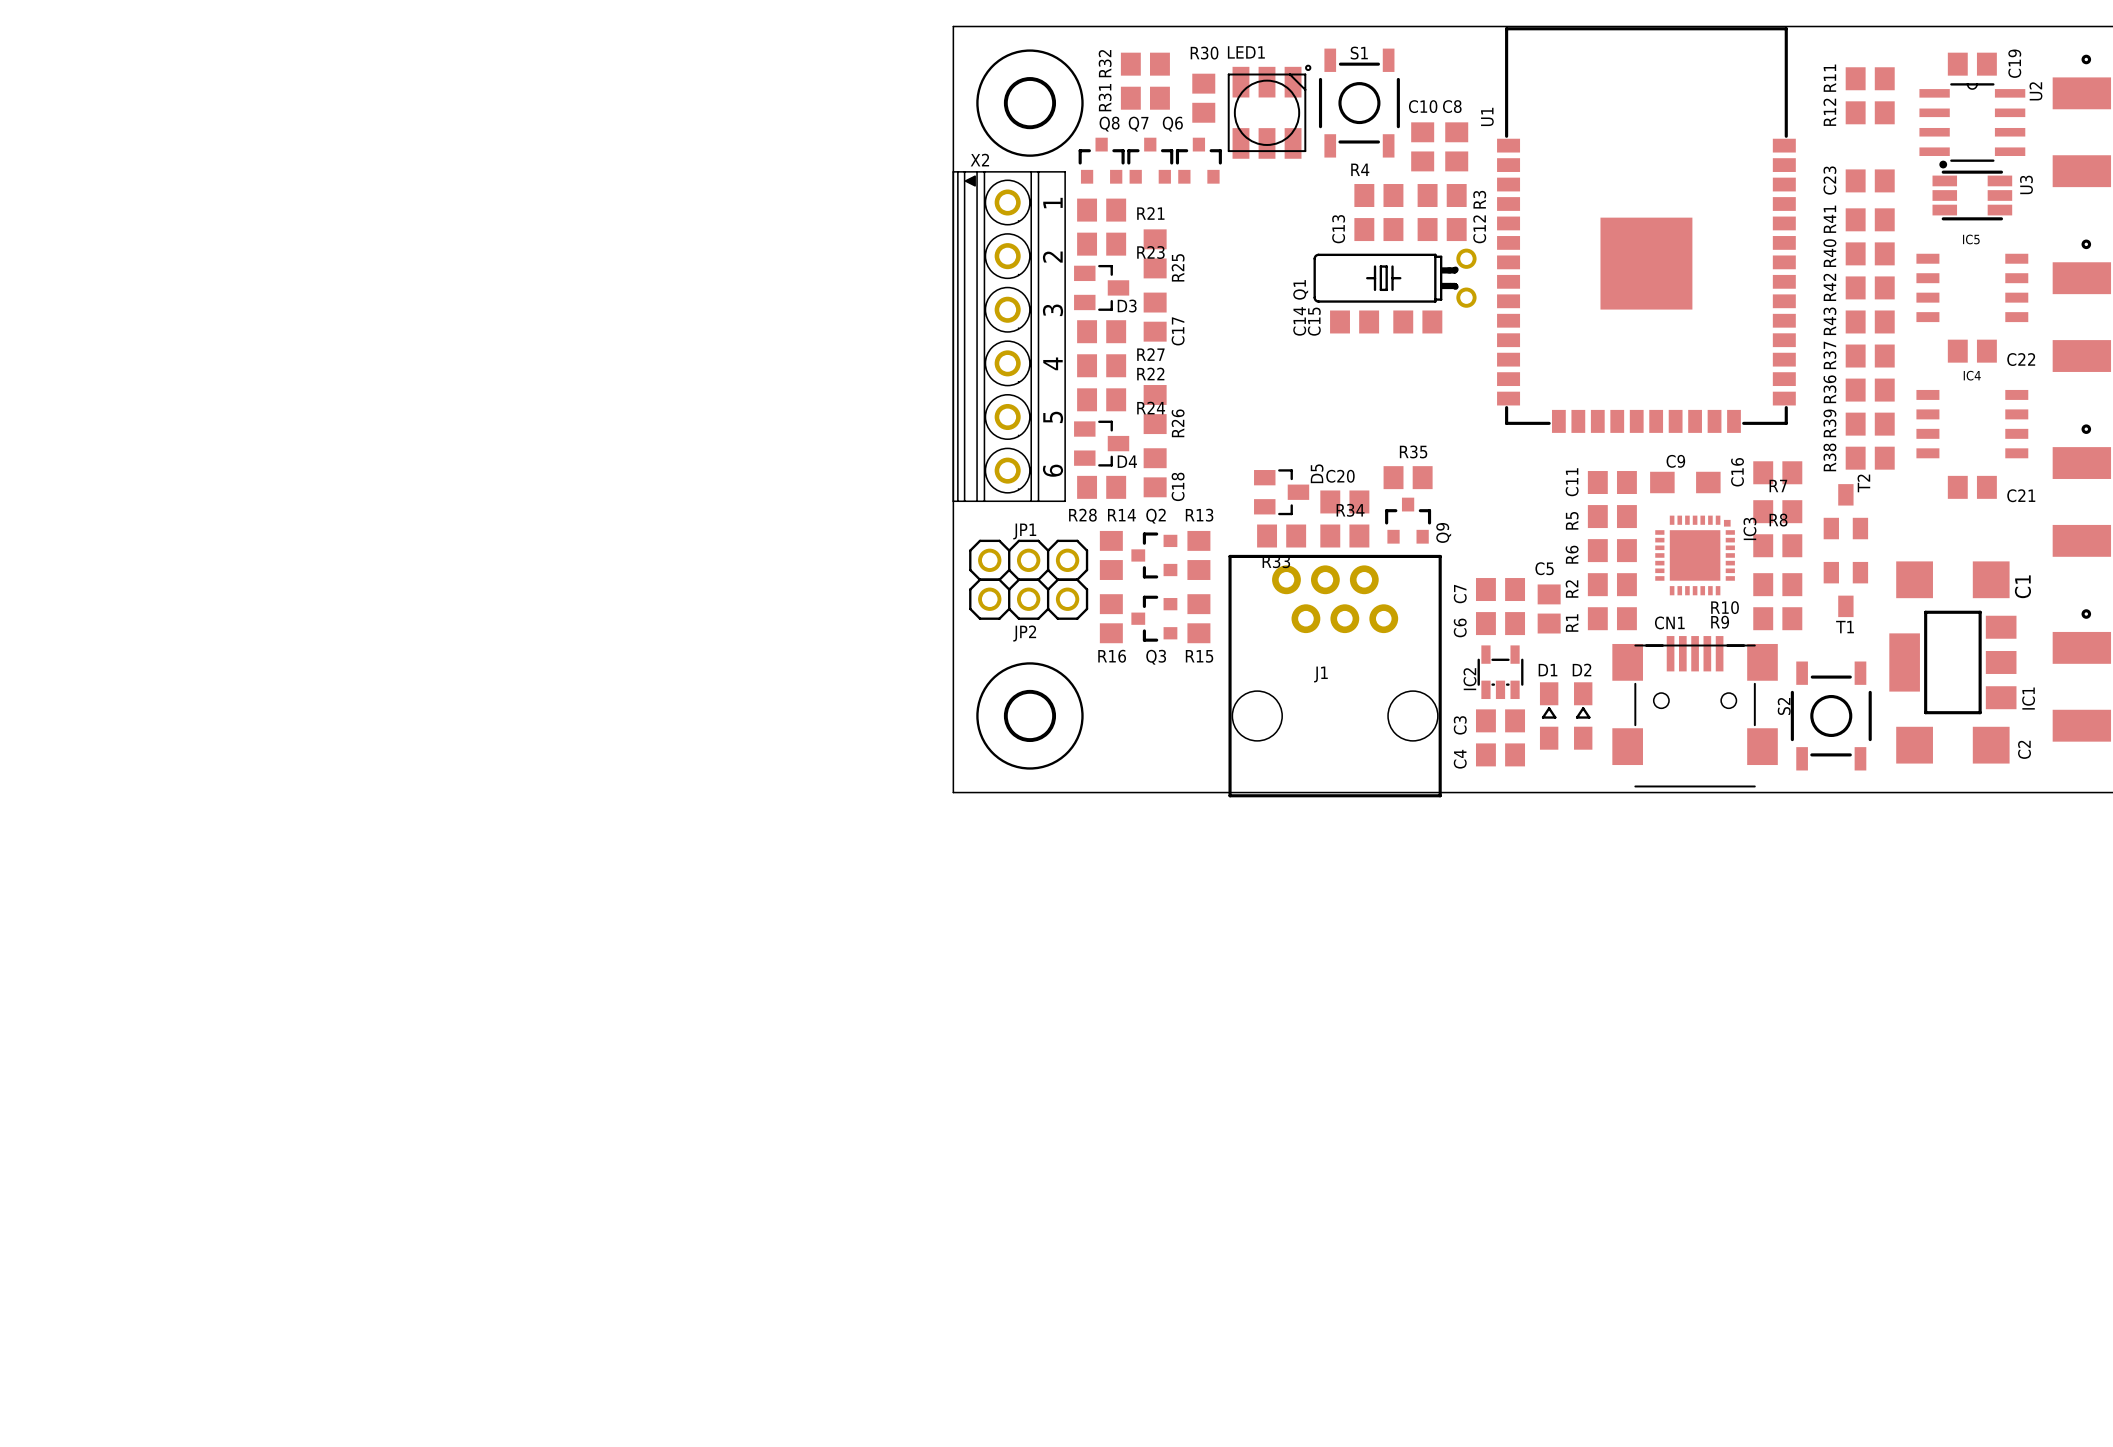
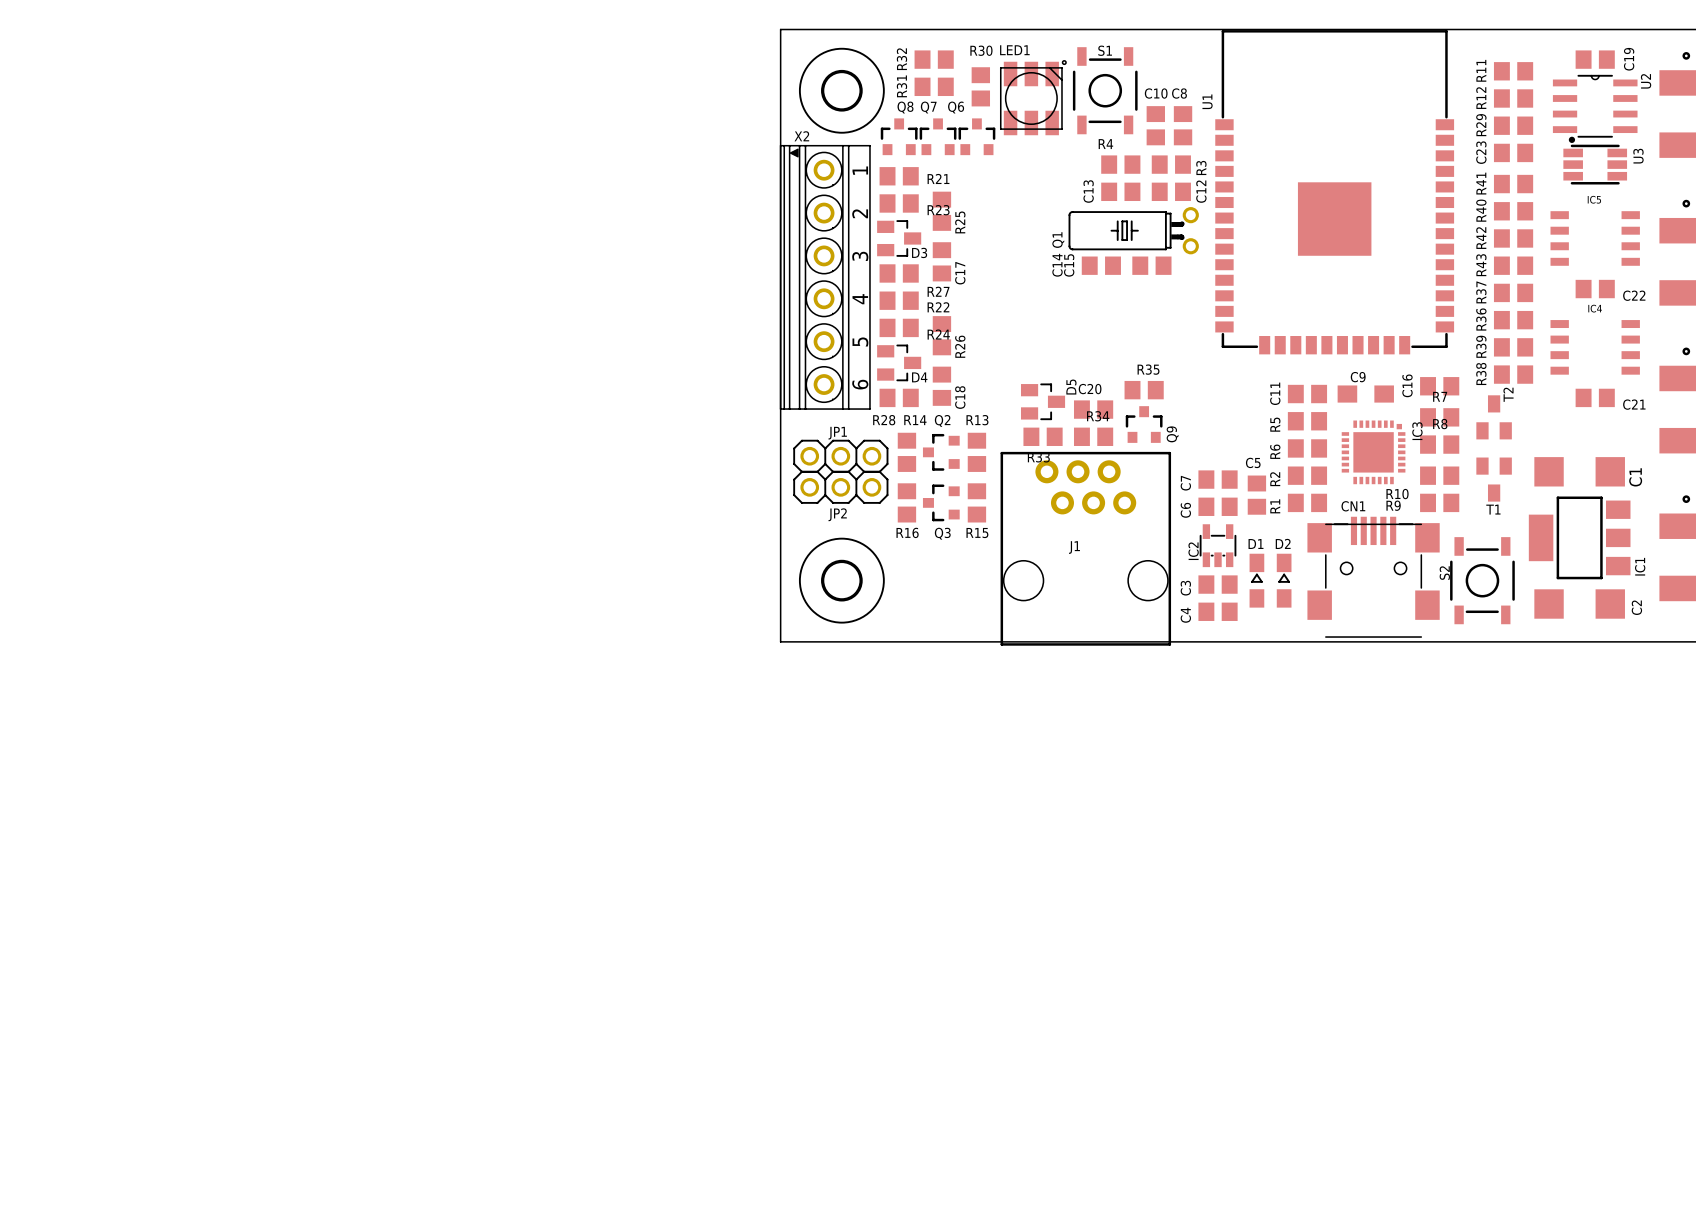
R29: none -> (1513, 125)

